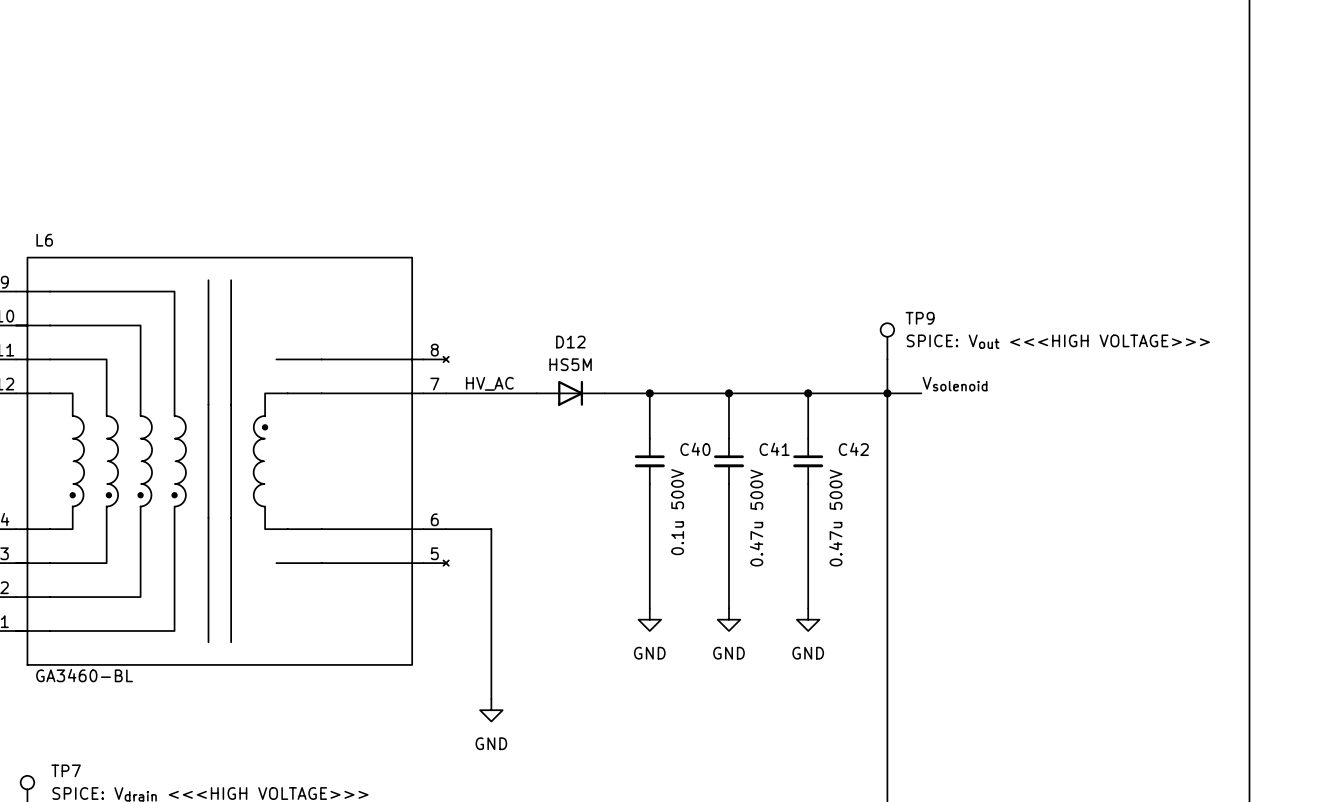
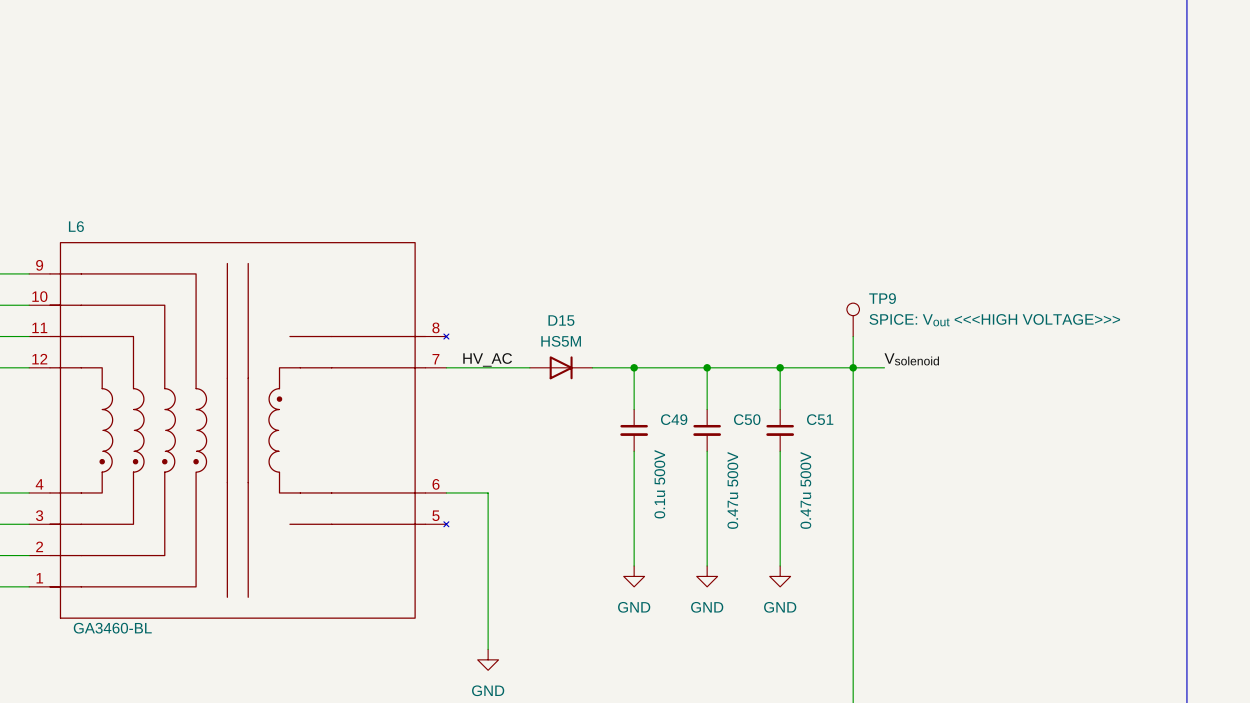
D12 name: D12 (570, 342) -> D15 (561, 320)
C40 name: C40 (695, 449) -> C49 (674, 419)
C41 name: C41 (774, 449) -> C50 (747, 419)
C42 name: C42 (853, 449) -> C51 (820, 419)

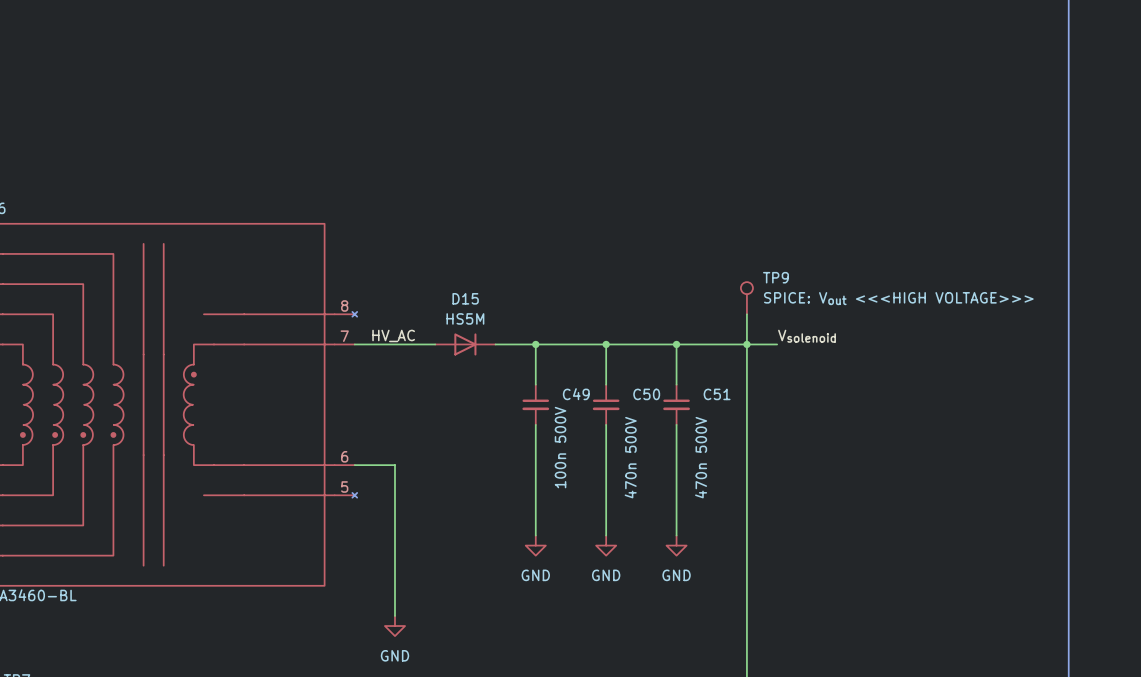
C49 value: 0.1u 500V (659, 484) -> 100n 500V (560, 447)
C50 value: 0.47u 500V (732, 490) -> 470n 500V (630, 457)
C51 value: 0.47u 500V (805, 490) -> 470n 500V (701, 457)

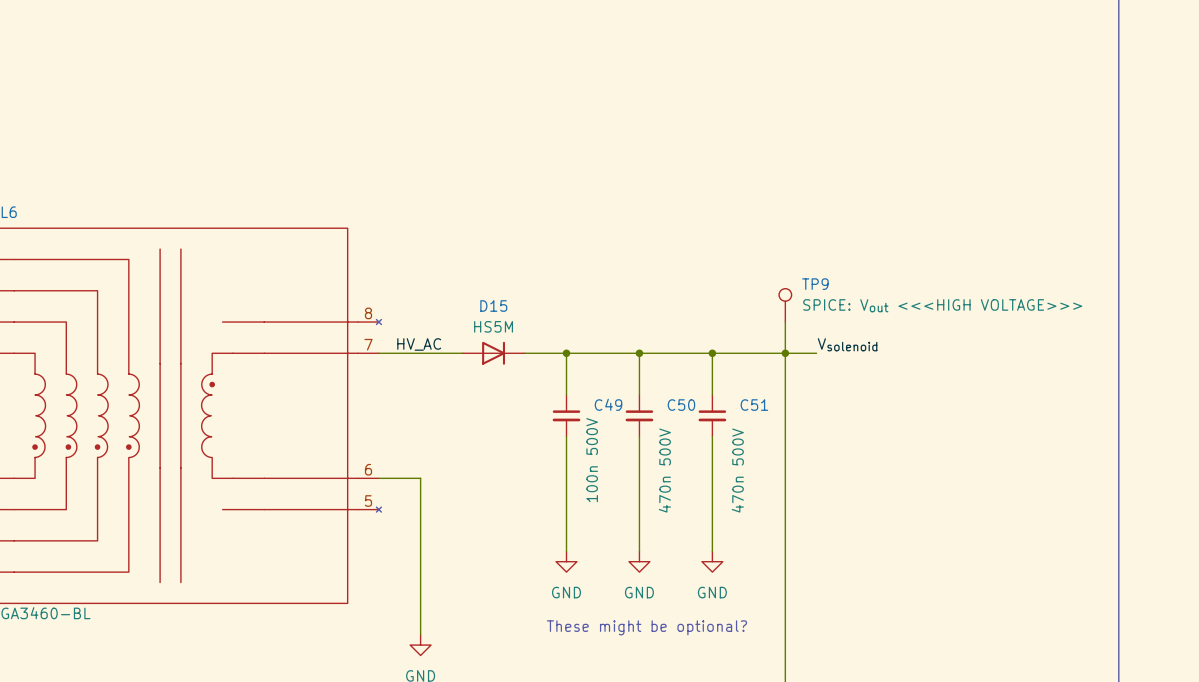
text: none -> These might be optional? (646, 627)

